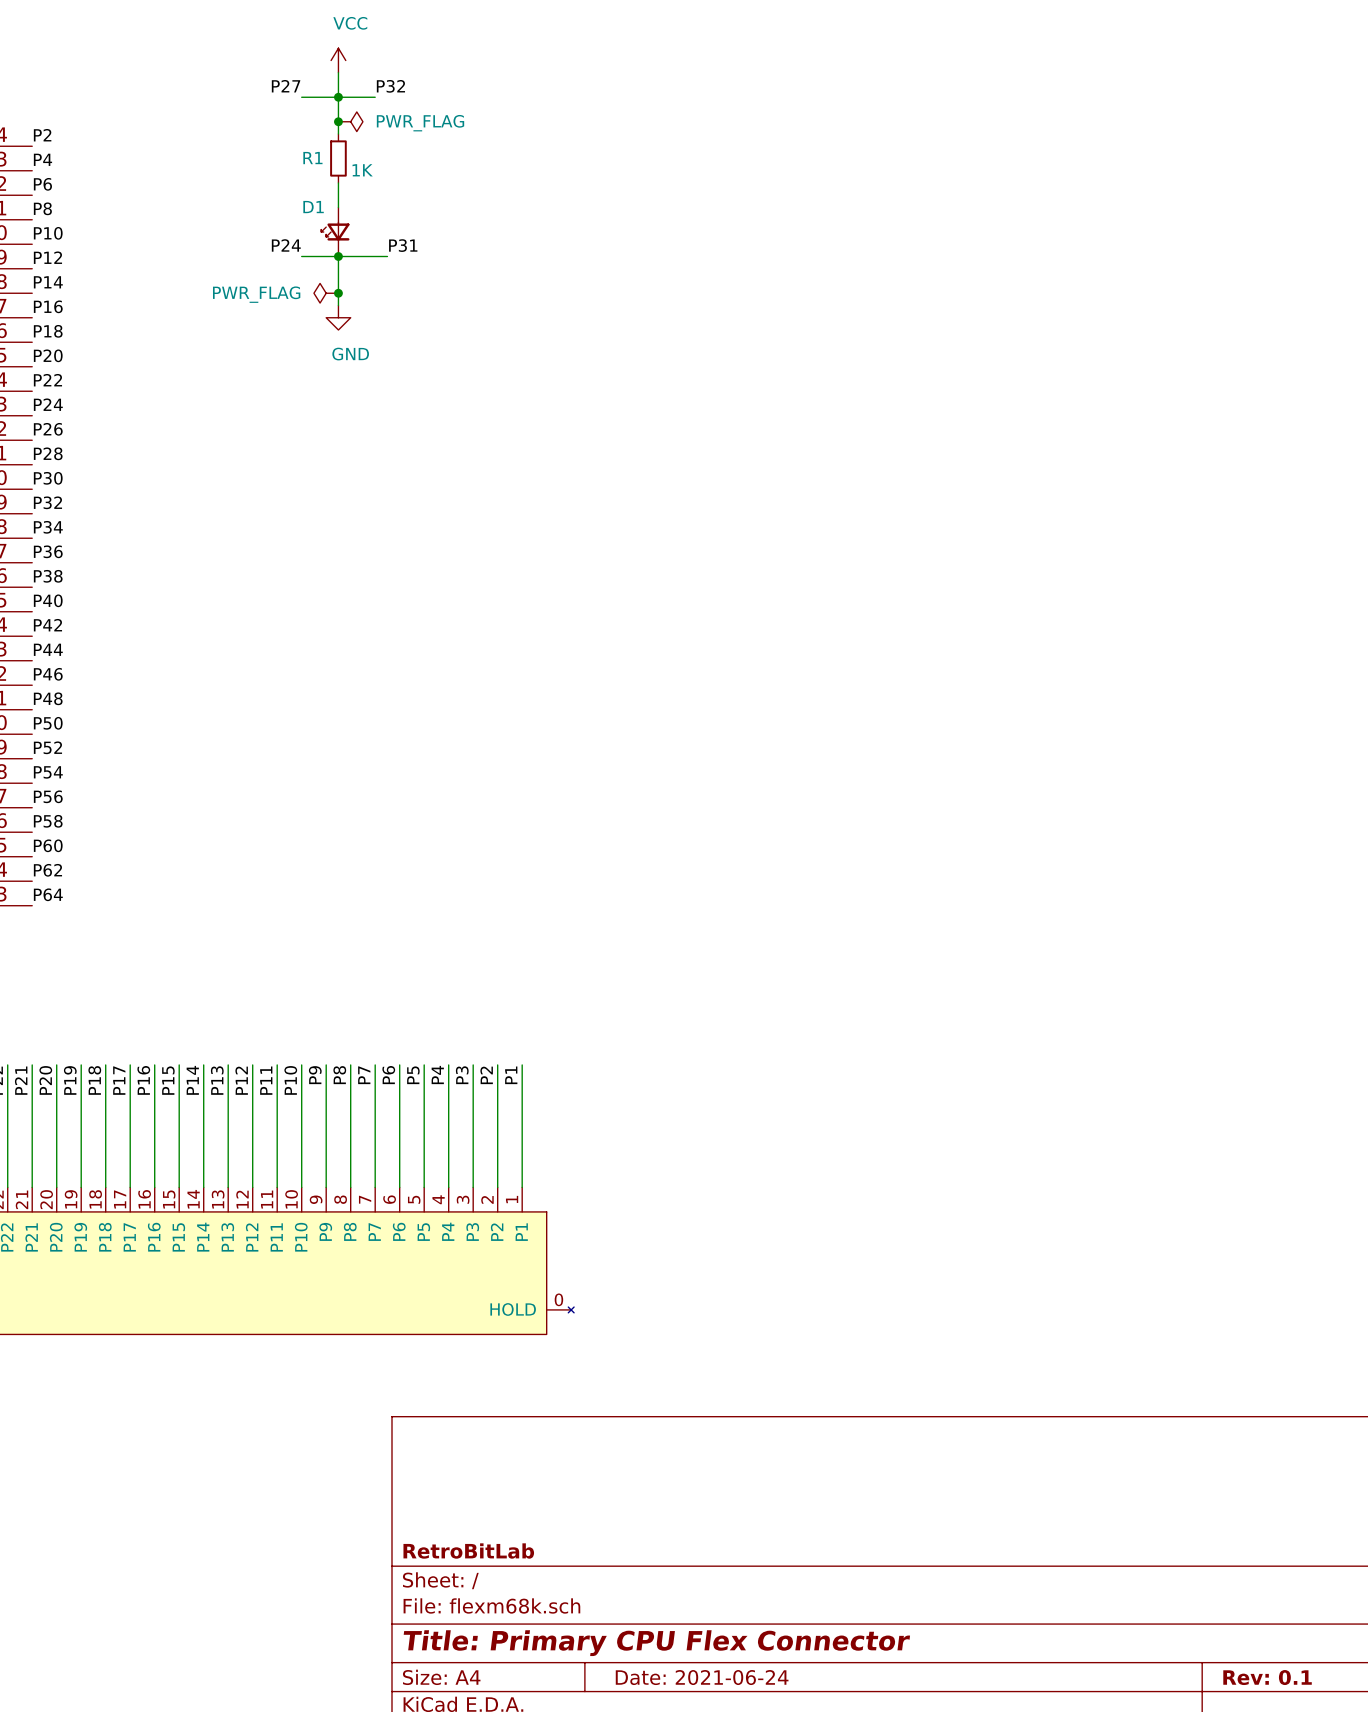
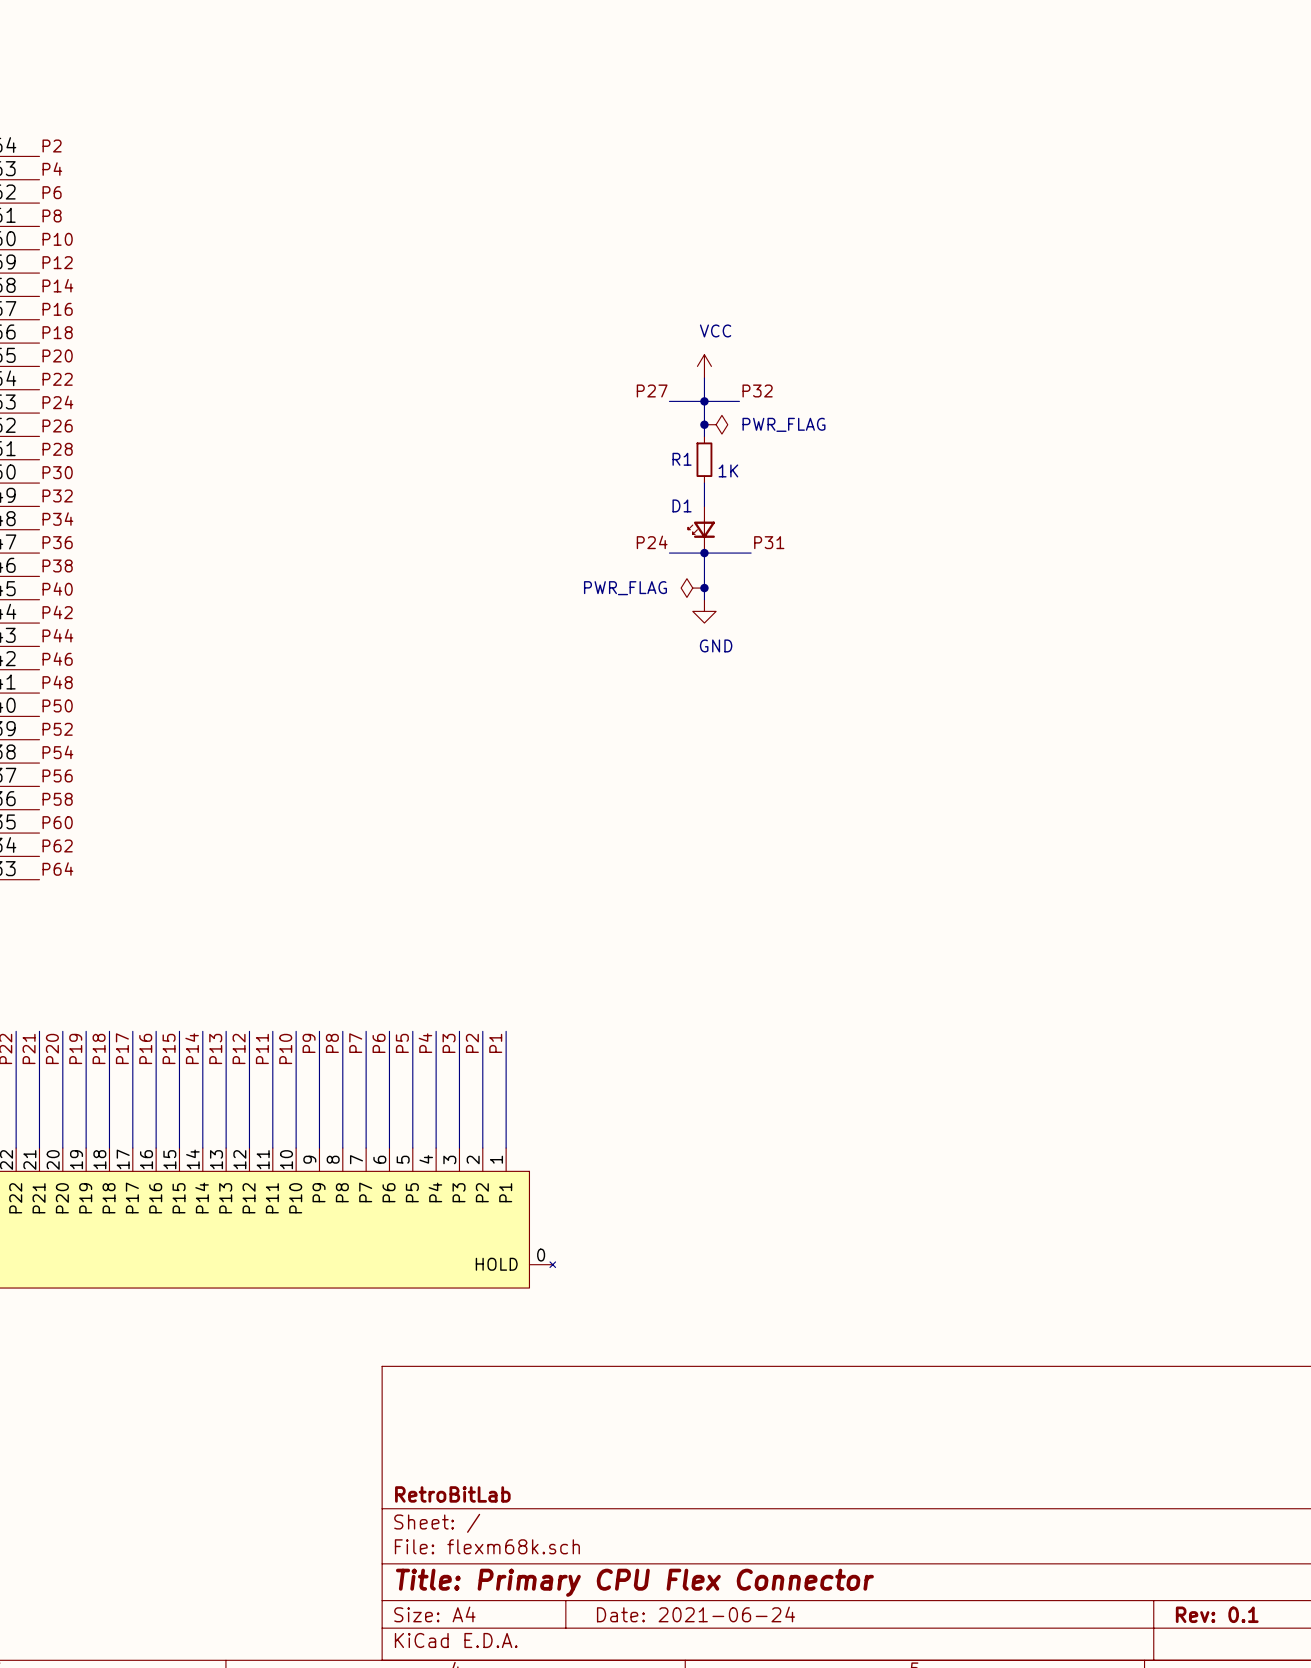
power symbol: VCC (338, 60) -> none
wire: (338, 72) (338, 134) -> none
label: P27 (286, 86) -> none
label: P32 (390, 86) -> none
wire: (301, 97) (375, 97) -> none
junction: (338, 97) -> none
junction: (338, 121) -> none
power symbol: PWR_FLAG (350, 121) -> none
R1 position: (338, 158) -> (704, 459)
wire: (338, 183) (338, 207) -> none
D1 position: (335, 232) -> (701, 529)
label: P24 (286, 245) -> none
label: P31 (403, 245) -> none
wire: (301, 256) (387, 256) -> none
wire: (338, 256) (338, 305) -> none
junction: (338, 256) -> none
power symbol: PWR_FLAG (326, 293) -> none
junction: (338, 293) -> none
power symbol: GND (338, 317) -> none
power symbol: none -> VCC (704, 366)
wire: none -> (704, 378) (704, 436)
label: none -> P27 (652, 390)
label: none -> P32 (757, 390)
wire: none -> (669, 401) (739, 401)
junction: none -> (704, 401)
junction: none -> (704, 424)
power symbol: none -> PWR_FLAG (716, 424)
wire: none -> (704, 483) (704, 506)
label: none -> P24 (652, 542)
label: none -> P31 (769, 542)
wire: none -> (669, 553) (751, 553)
wire: none -> (704, 553) (704, 599)
junction: none -> (704, 553)
power symbol: none -> PWR_FLAG (692, 588)
junction: none -> (704, 588)
power symbol: none -> GND (704, 611)

